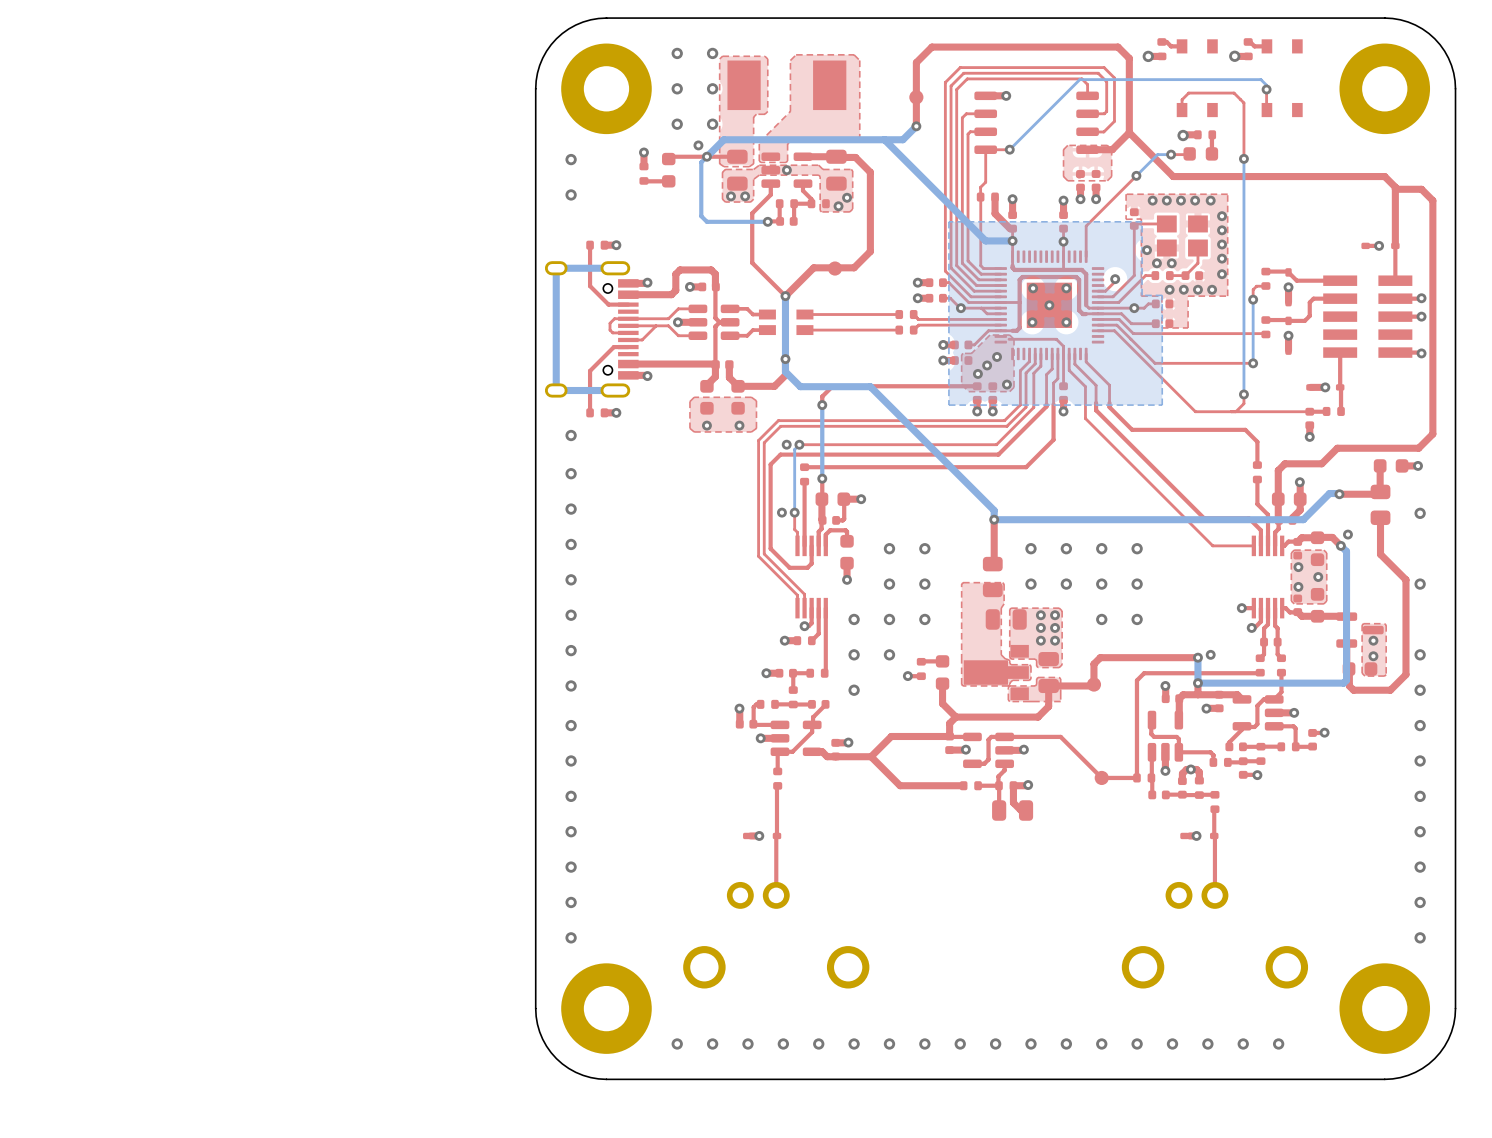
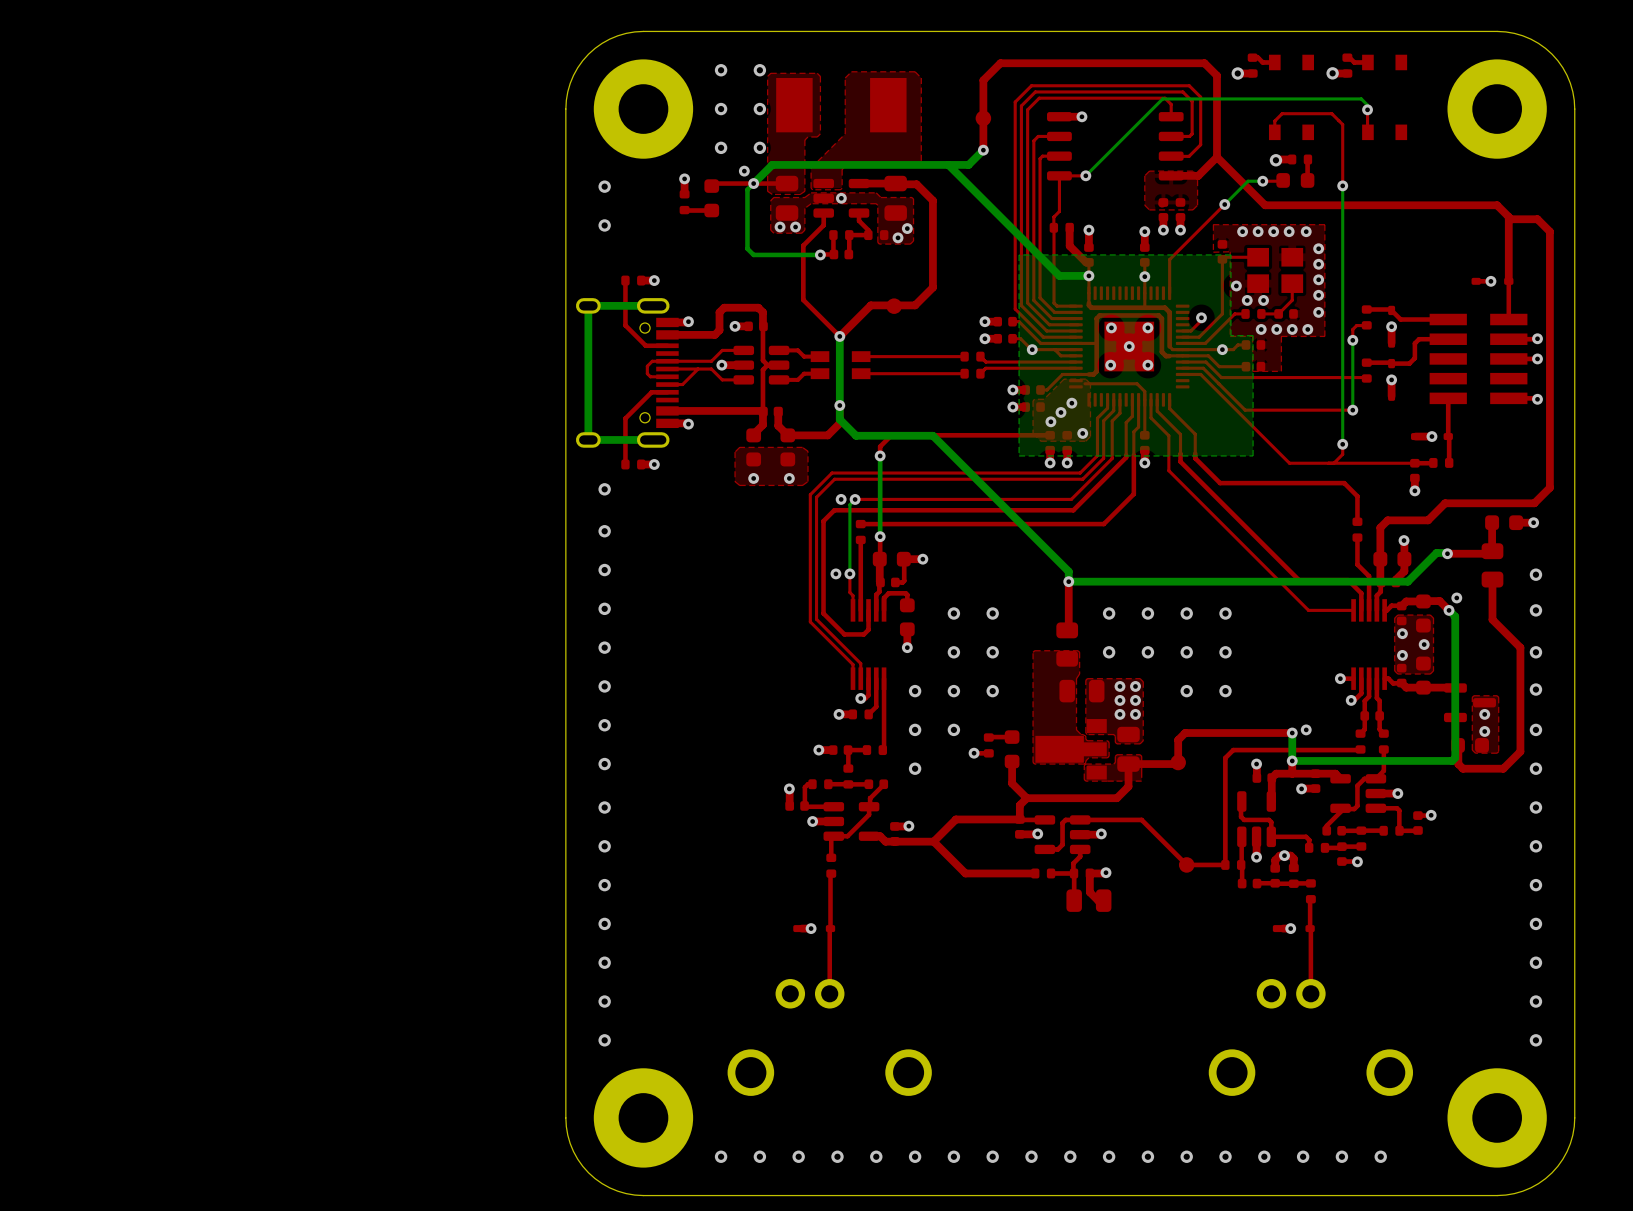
via: none -> (1535, 610)
via: none -> (1535, 689)

